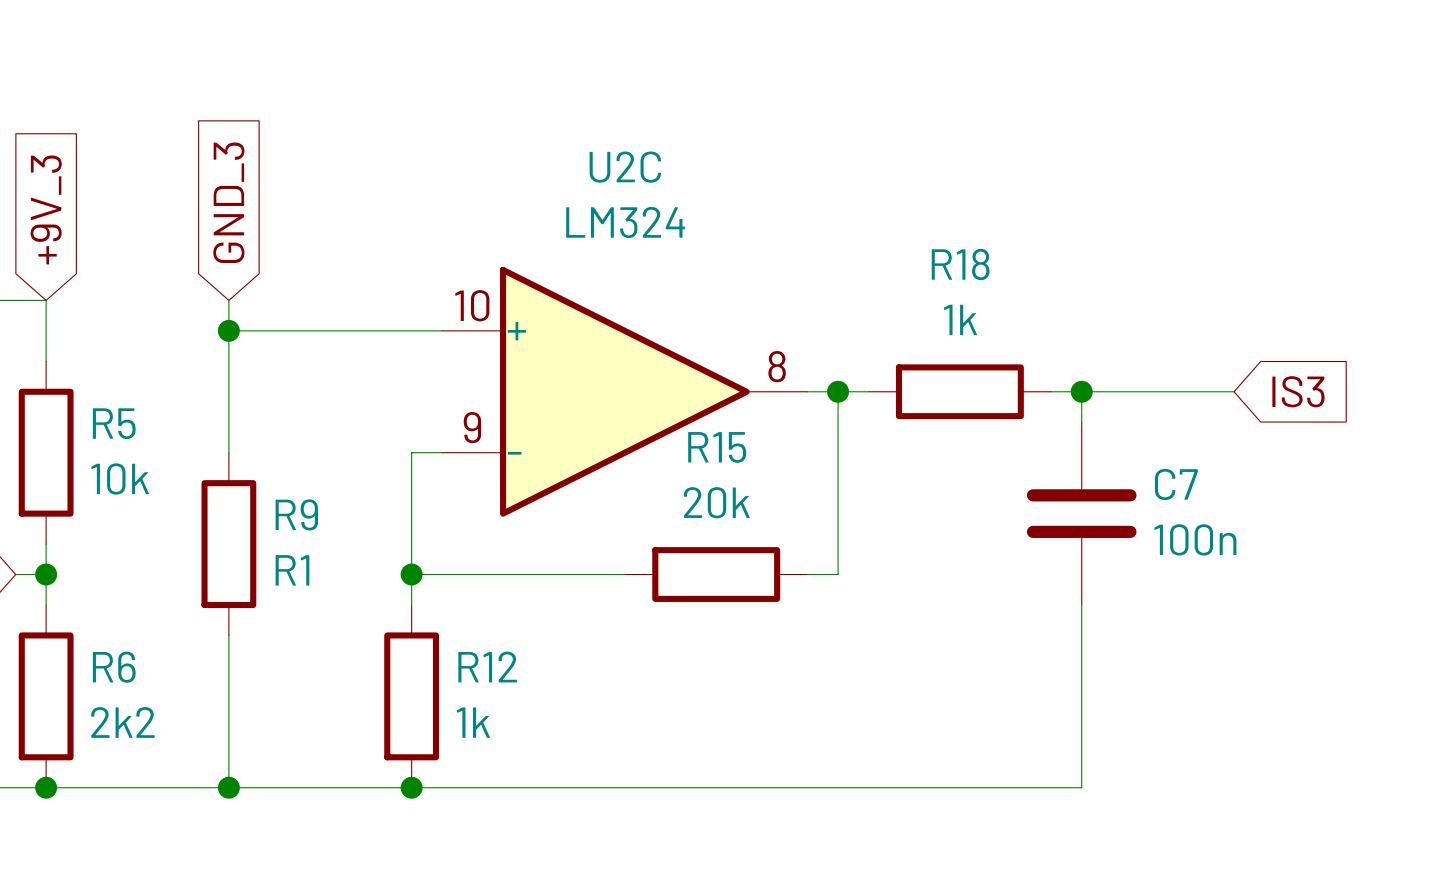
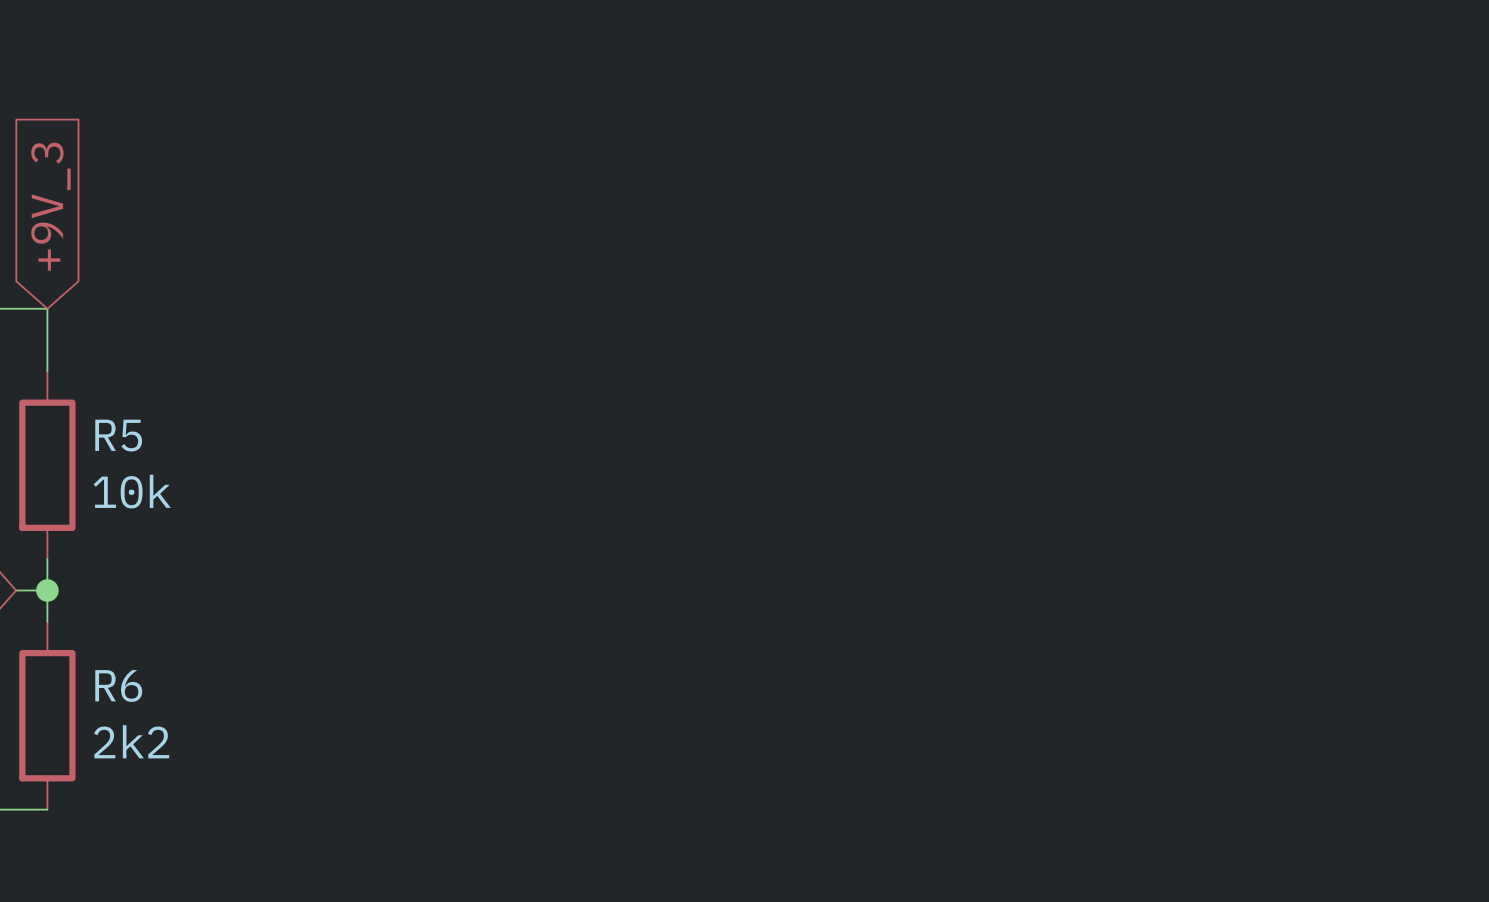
global label: GND_3 (228, 202) -> none
wire: (228, 300) (228, 452) -> none
wire: (228, 330) (442, 330) -> none
junction: (228, 330) -> none
U2C: LM324 (624, 391) -> none
wire: (807, 391) (868, 391) -> none
wire: (838, 391) (838, 574) (807, 574) -> none
junction: (838, 391) -> none
R18: 1k (959, 391) -> none
wire: (1051, 391) (1234, 391) -> none
wire: (1081, 391) (1081, 422) -> none
junction: (1081, 391) -> none
global label: IS3 (1298, 391) -> none
wire: (442, 452) (411, 452) (411, 604) -> none
C7: 100n (1081, 513) -> none
R9: R1 (228, 544) -> none
wire: (411, 574) (624, 574) -> none
junction: (411, 574) -> none
R15: 20k (716, 574) -> none
wire: (1081, 604) (1081, 787) (46, 787) -> none
wire: (228, 635) (228, 787) -> none
R12: 1k (411, 696) -> none
junction: (46, 787) -> none
junction: (228, 787) -> none
junction: (411, 787) -> none

